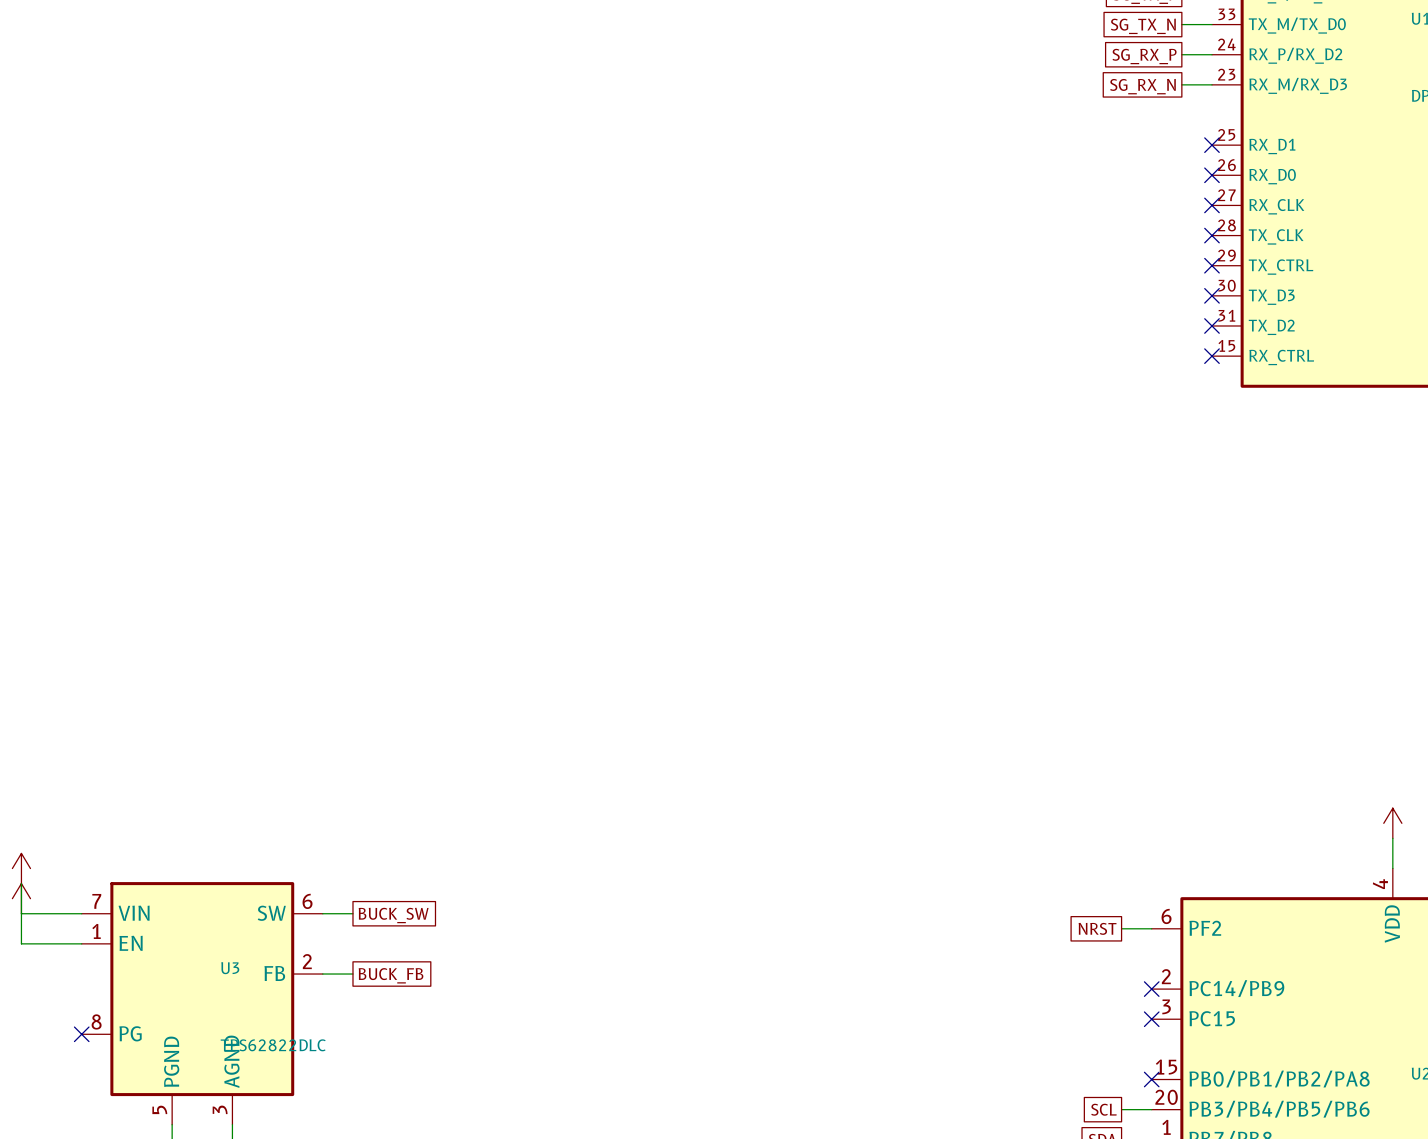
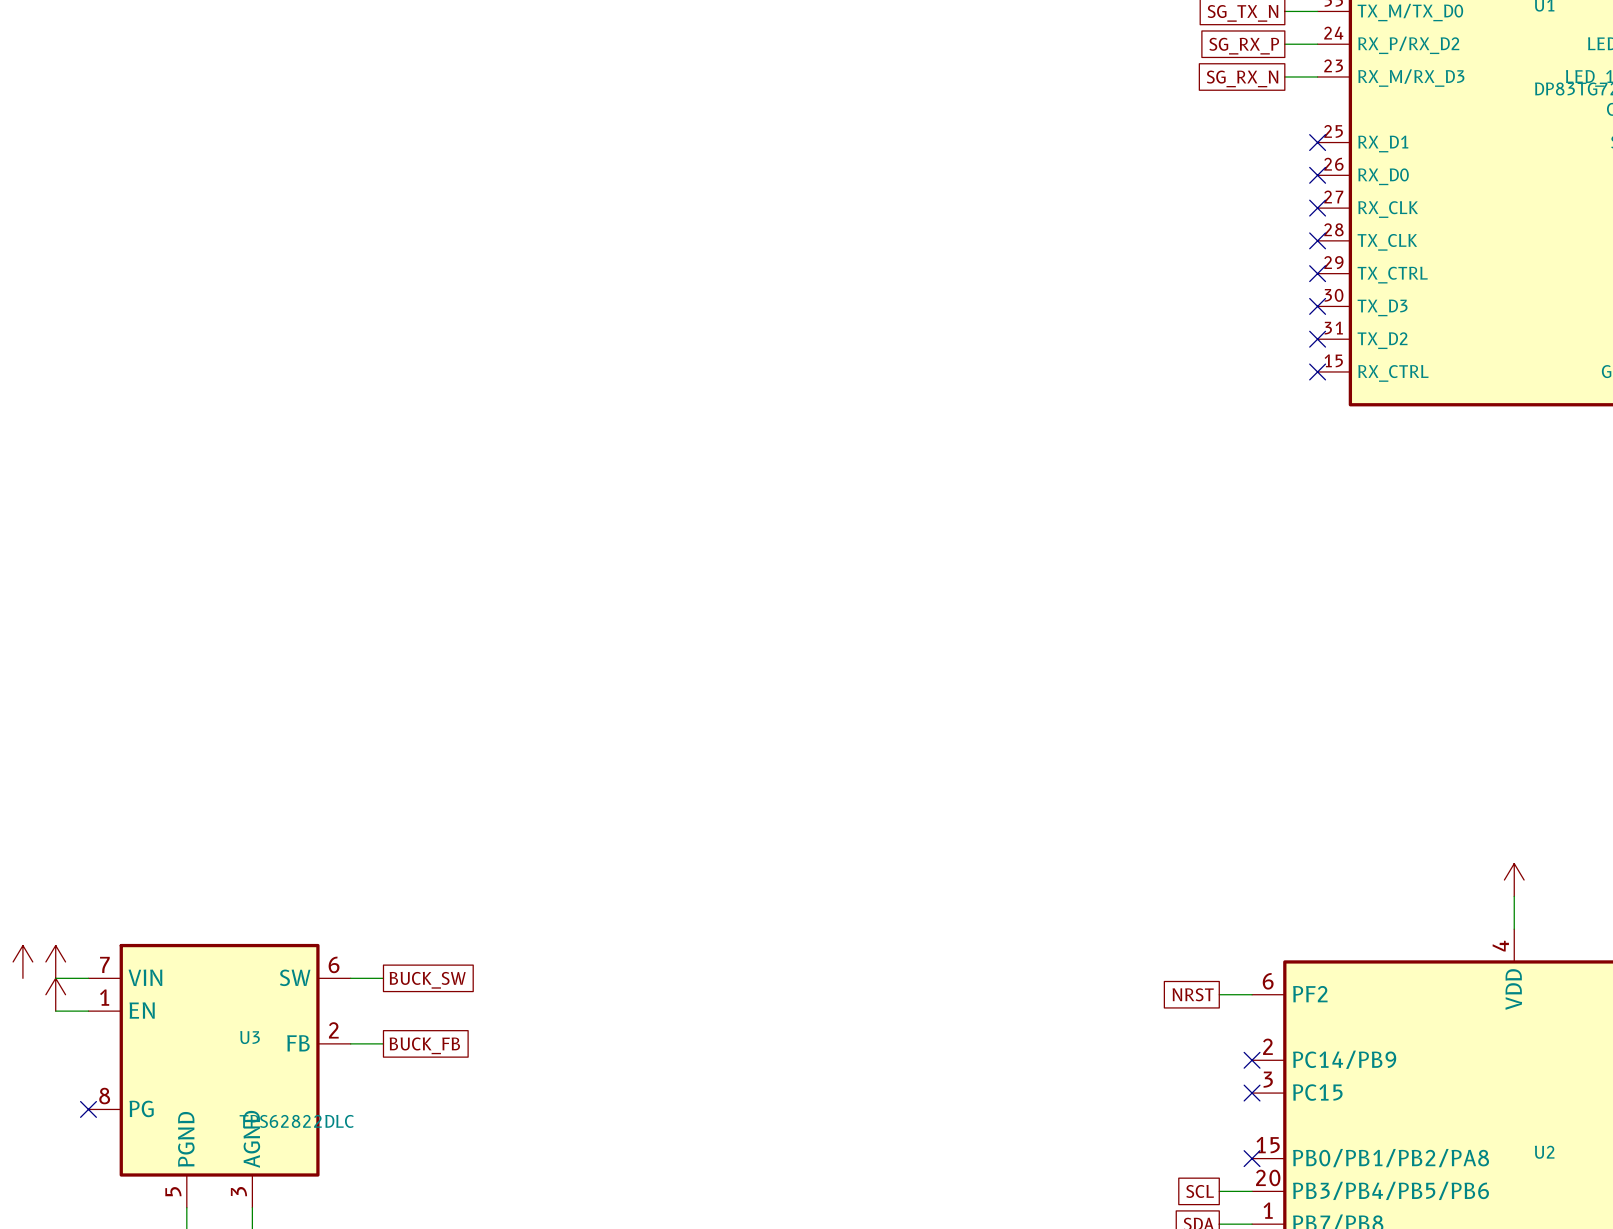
power symbol: (21, 868) -> none
wire: (21, 883) (21, 943) (51, 943) -> none
power symbol: none -> (55, 961)
wire: (21, 913) (51, 913) -> none
power symbol: none -> (55, 994)

